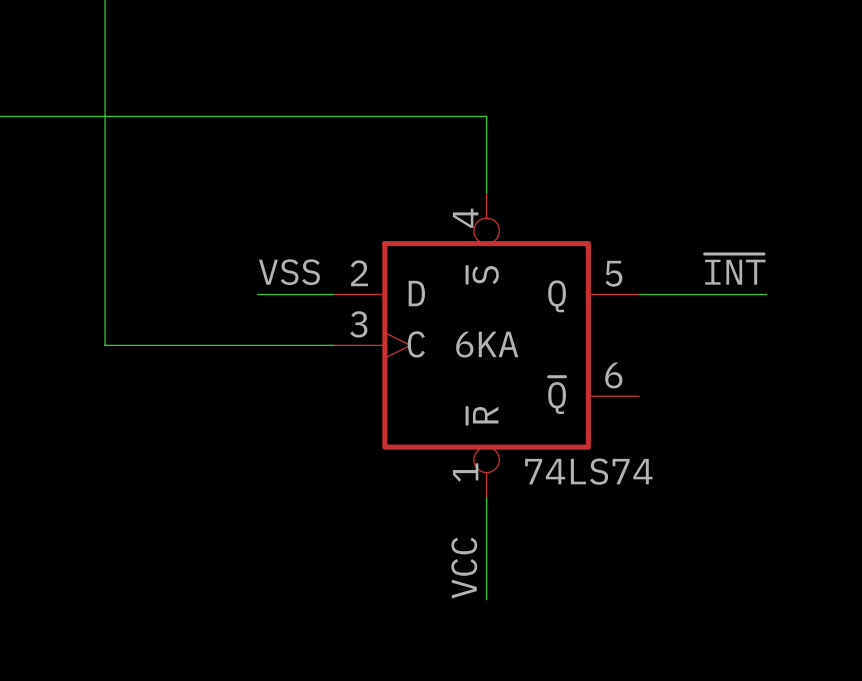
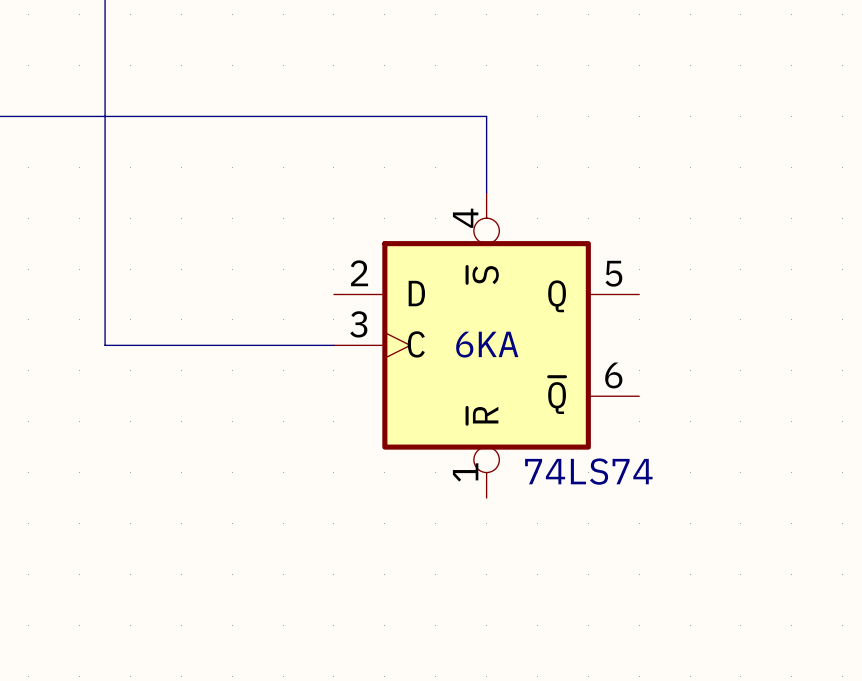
label: ~{INT} (735, 269) -> none
label: VSS (289, 272) -> none
wire: (257, 294) (333, 294) -> none
wire: (639, 294) (766, 294) -> none
wire: (486, 497) (486, 599) -> none
label: VCC (464, 568) -> none

